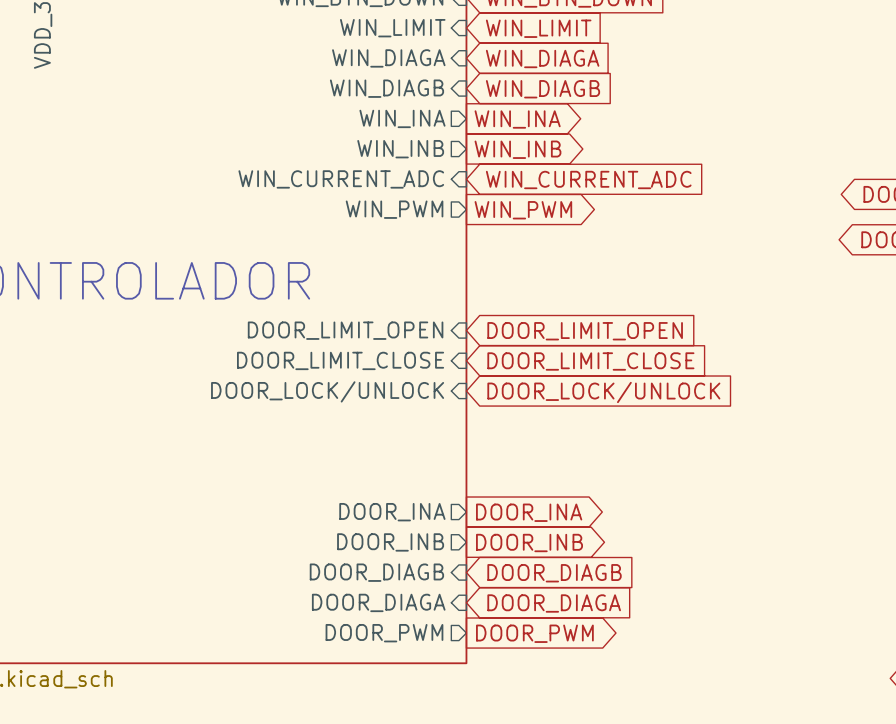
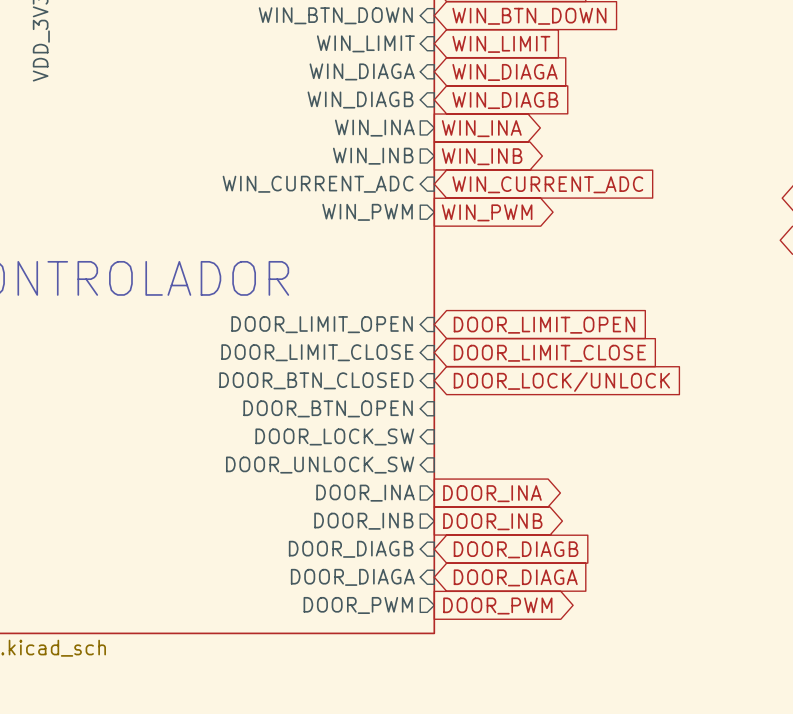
sheet pin: DOOR_LOCK/UNLOCK (327, 391) -> DOOR_BTN_CLOSED (316, 380)
sheet pin: none -> DOOR_BTN_OPEN (328, 408)
sheet pin: none -> DOOR_LOCK_SW (334, 436)
sheet pin: none -> DOOR_UNLOCK_SW (320, 465)

